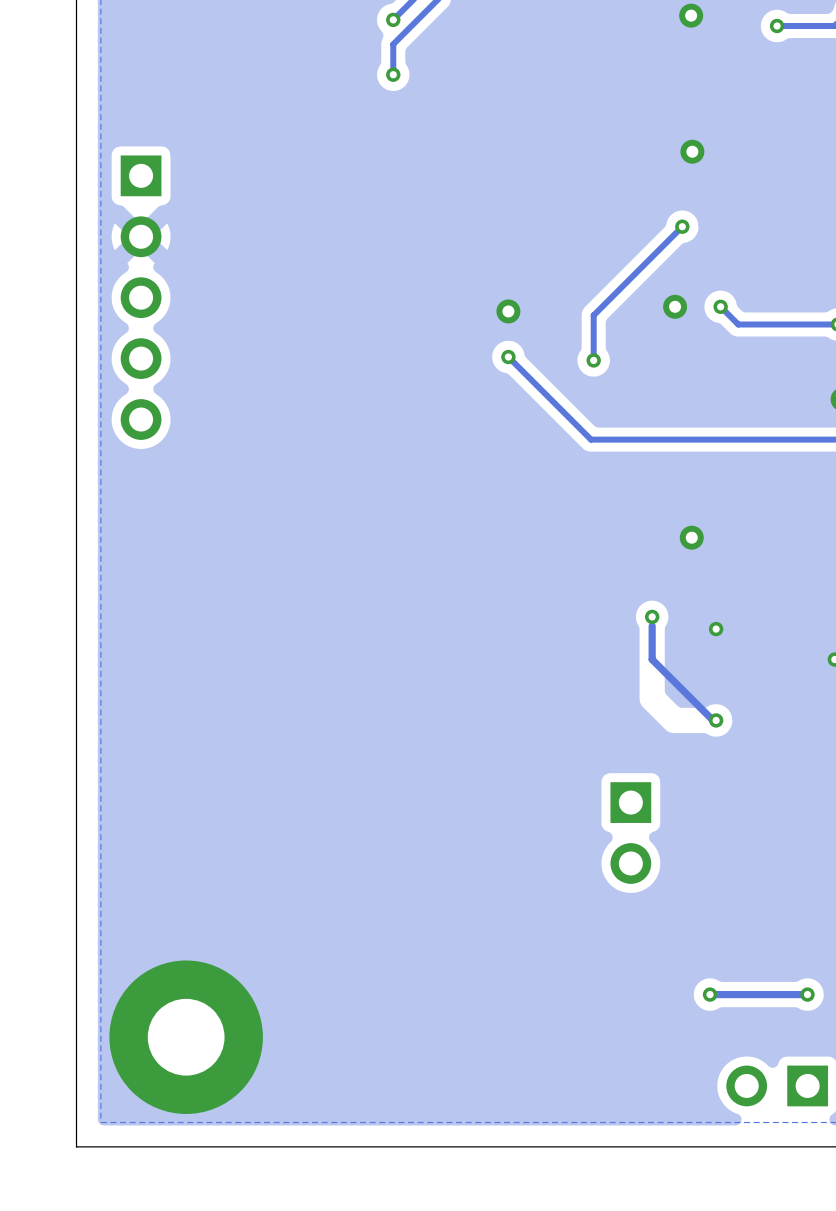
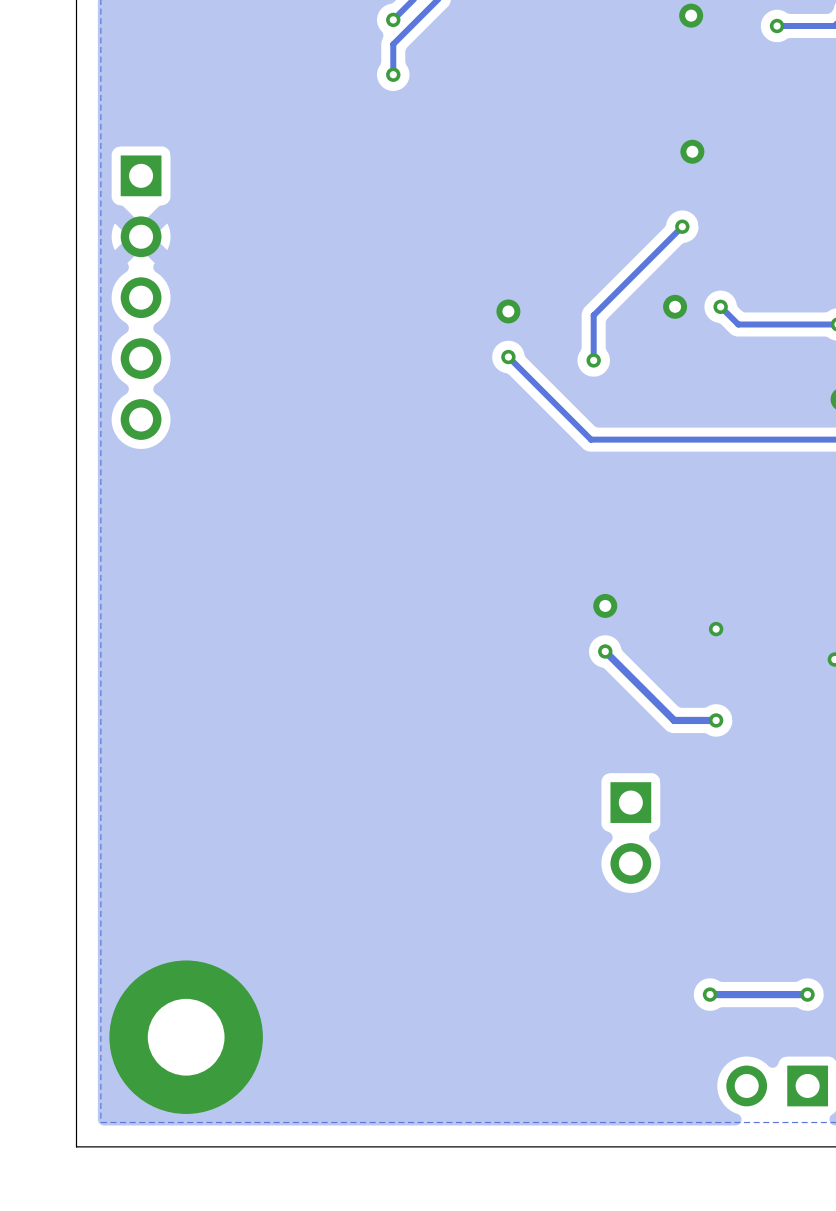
via position: (691, 537) -> (605, 605)
via position: (652, 616) -> (605, 651)
track: (652, 626) (652, 659) (713, 720) -> (605, 651) (674, 720) (713, 720)

